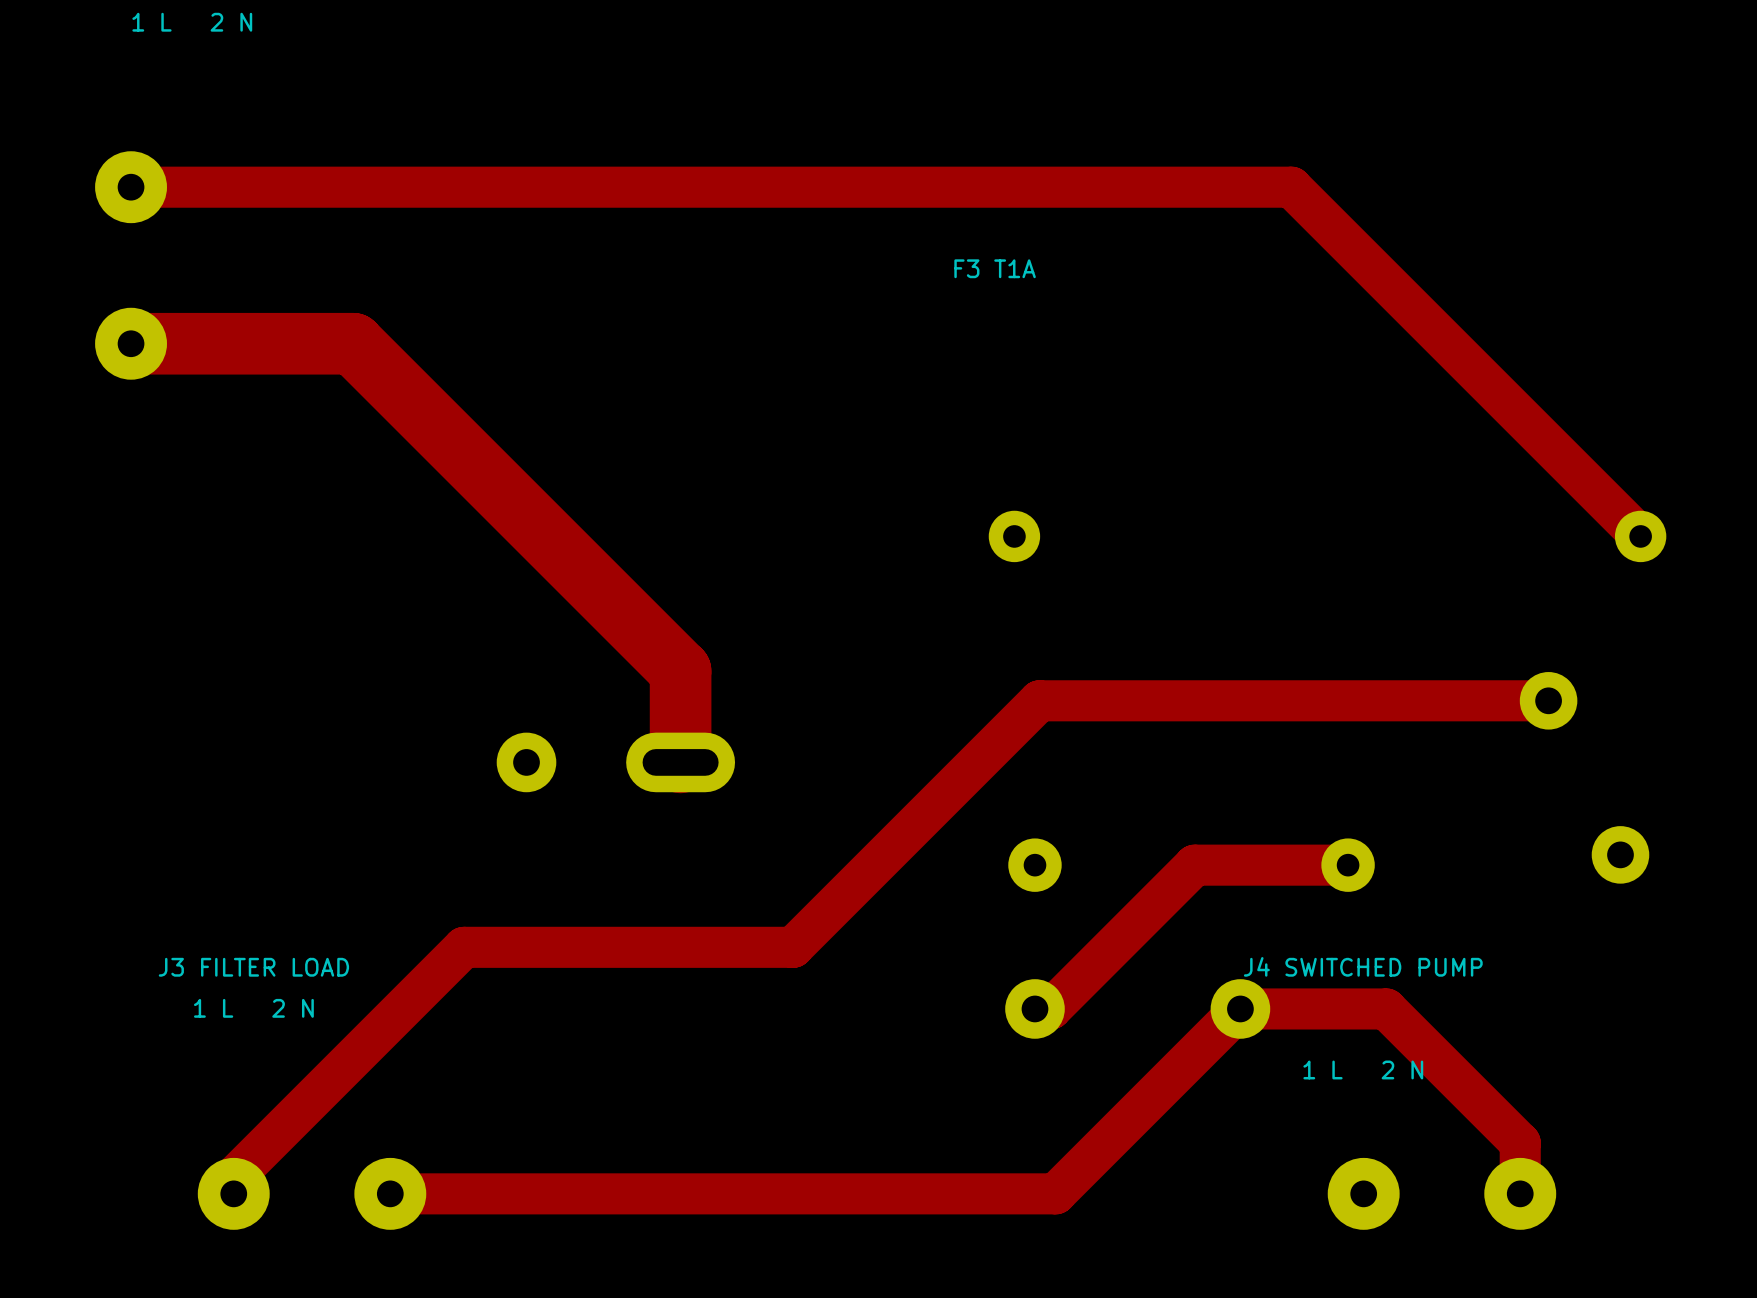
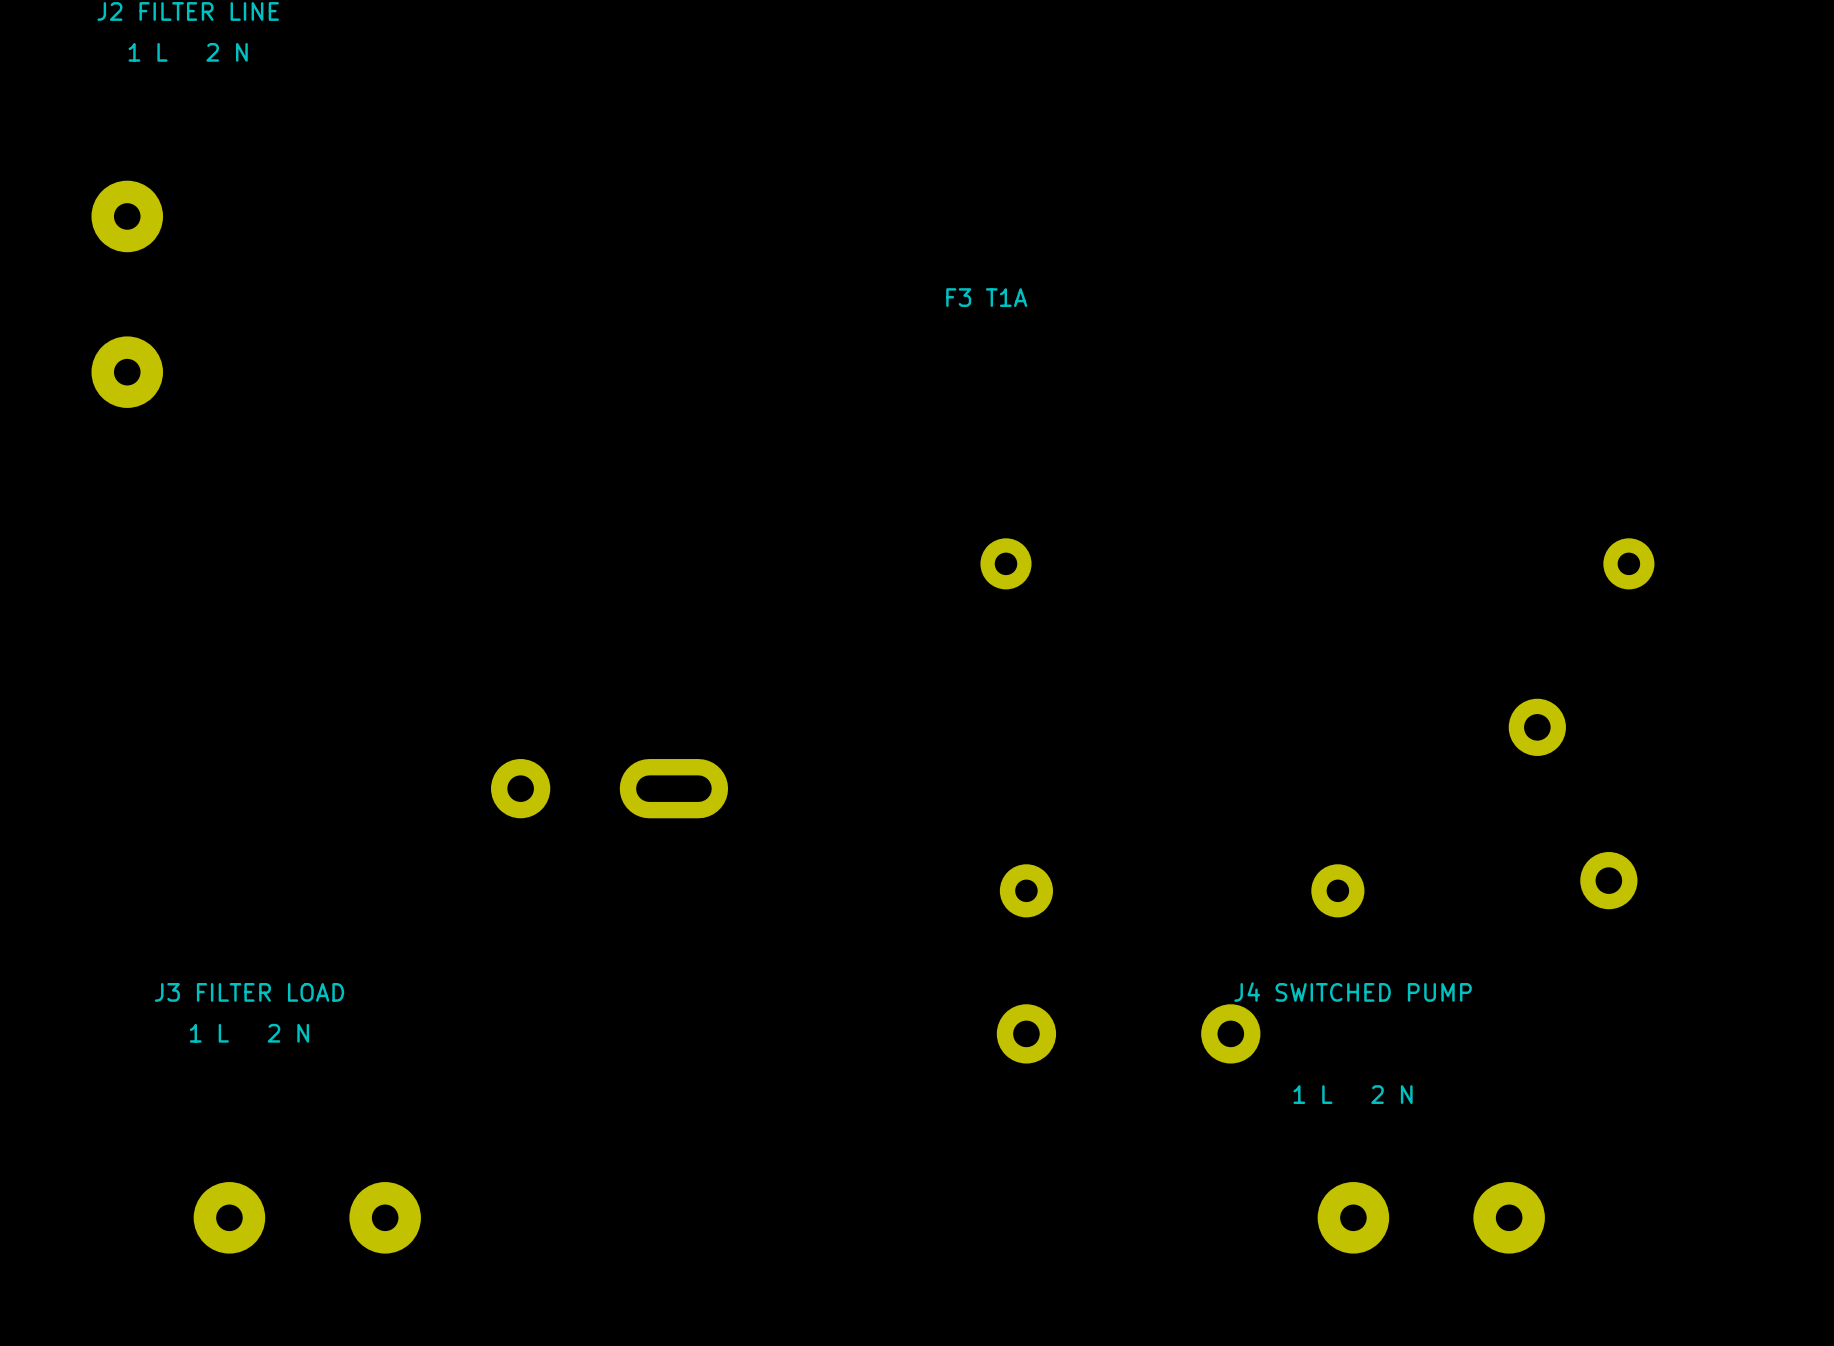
track: (131, 187) (1291, 187) (1640, 536) -> none
track: (131, 343) (353, 343) (680, 671) (680, 762) -> none
track: (1548, 700) (1039, 700) (793, 947) (463, 947) (233, 1177) (233, 1193) -> none
track: (1348, 865) (1194, 865) (1050, 1008) (1034, 1008) -> none
track: (390, 1193) (1055, 1193) (1240, 1008) (1386, 1008) (1520, 1143) (1520, 1193) -> none

